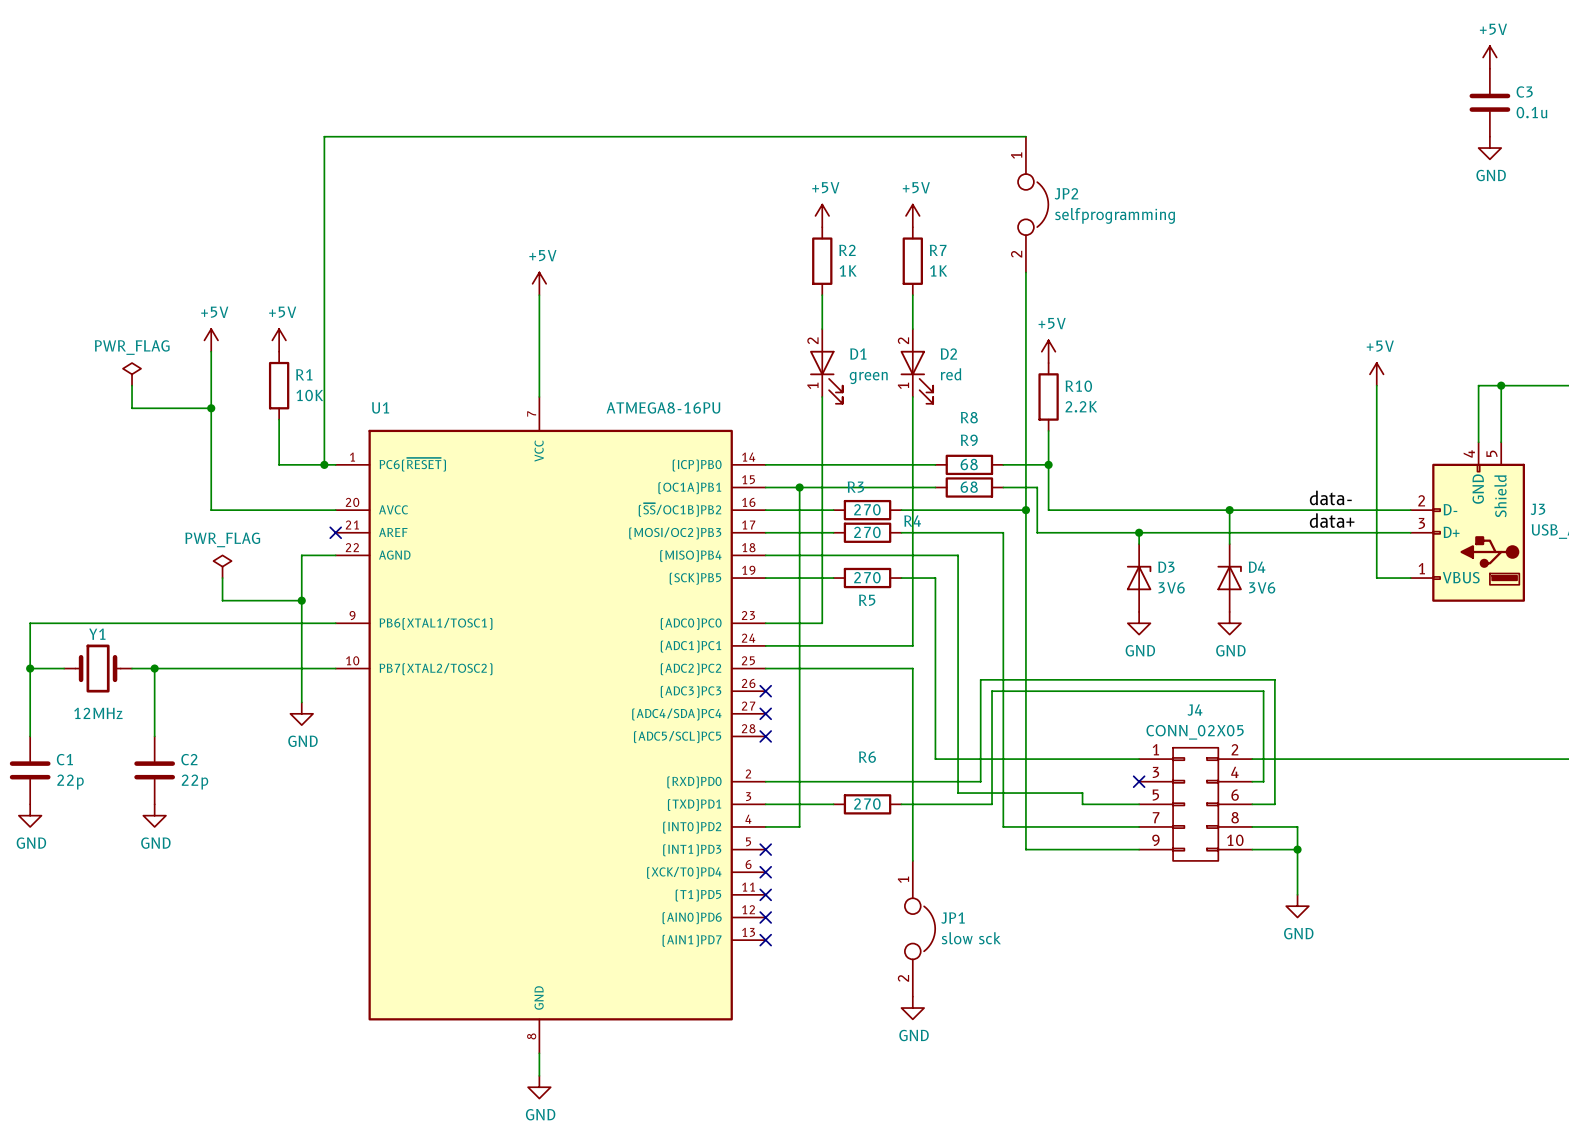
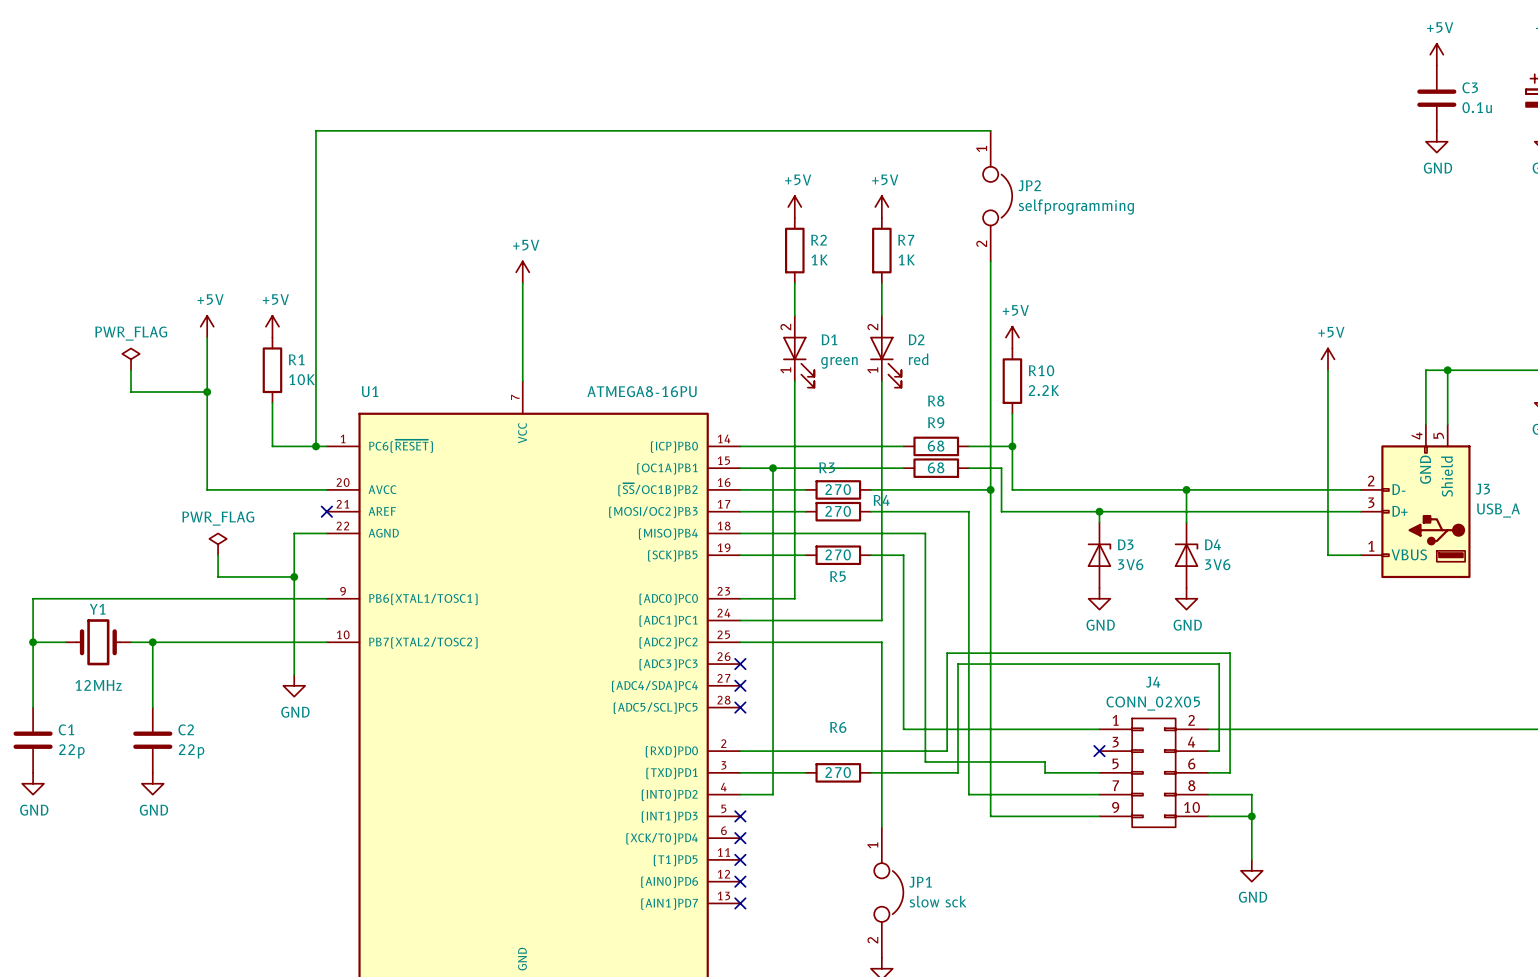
label: data- (1330, 497) -> none
label: data+ (1332, 520) -> none

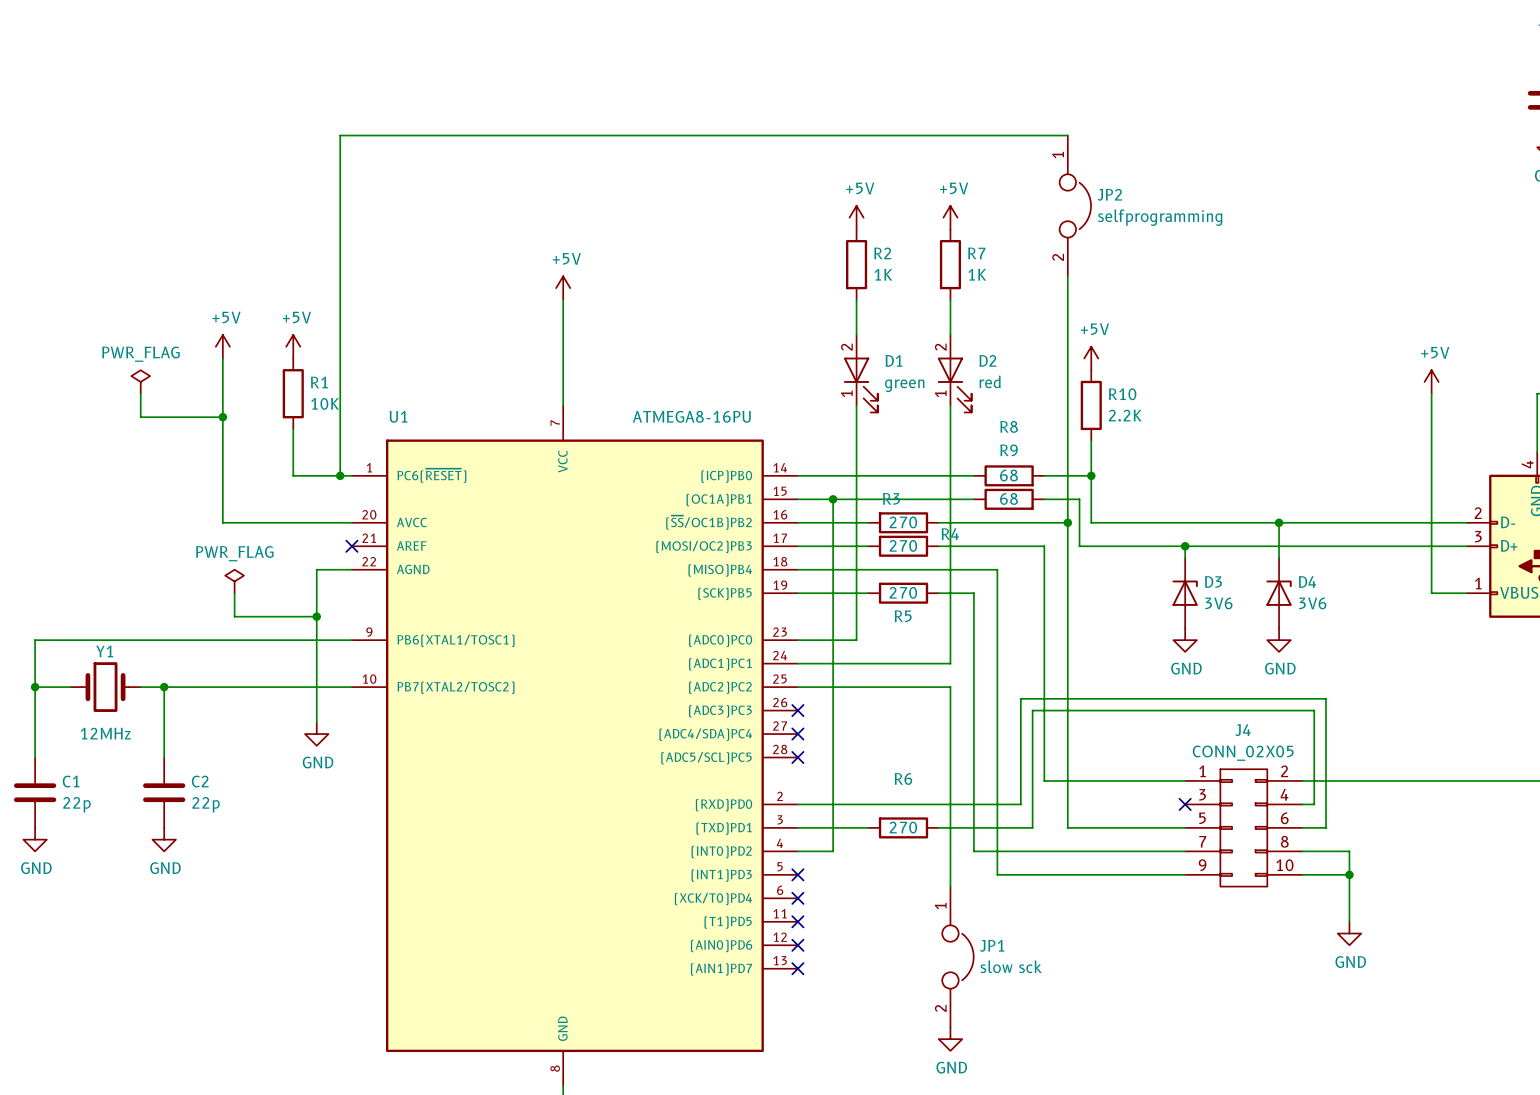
wire: (903, 729) (968, 729) (968, 794) -> (973, 780) (973, 851) (1044, 851)
wire: (925, 761) (1045, 761) (1045, 772) -> (1067, 827) (1126, 827)
wire: (990, 772) (990, 816) -> (997, 816) (997, 874) (1067, 874)

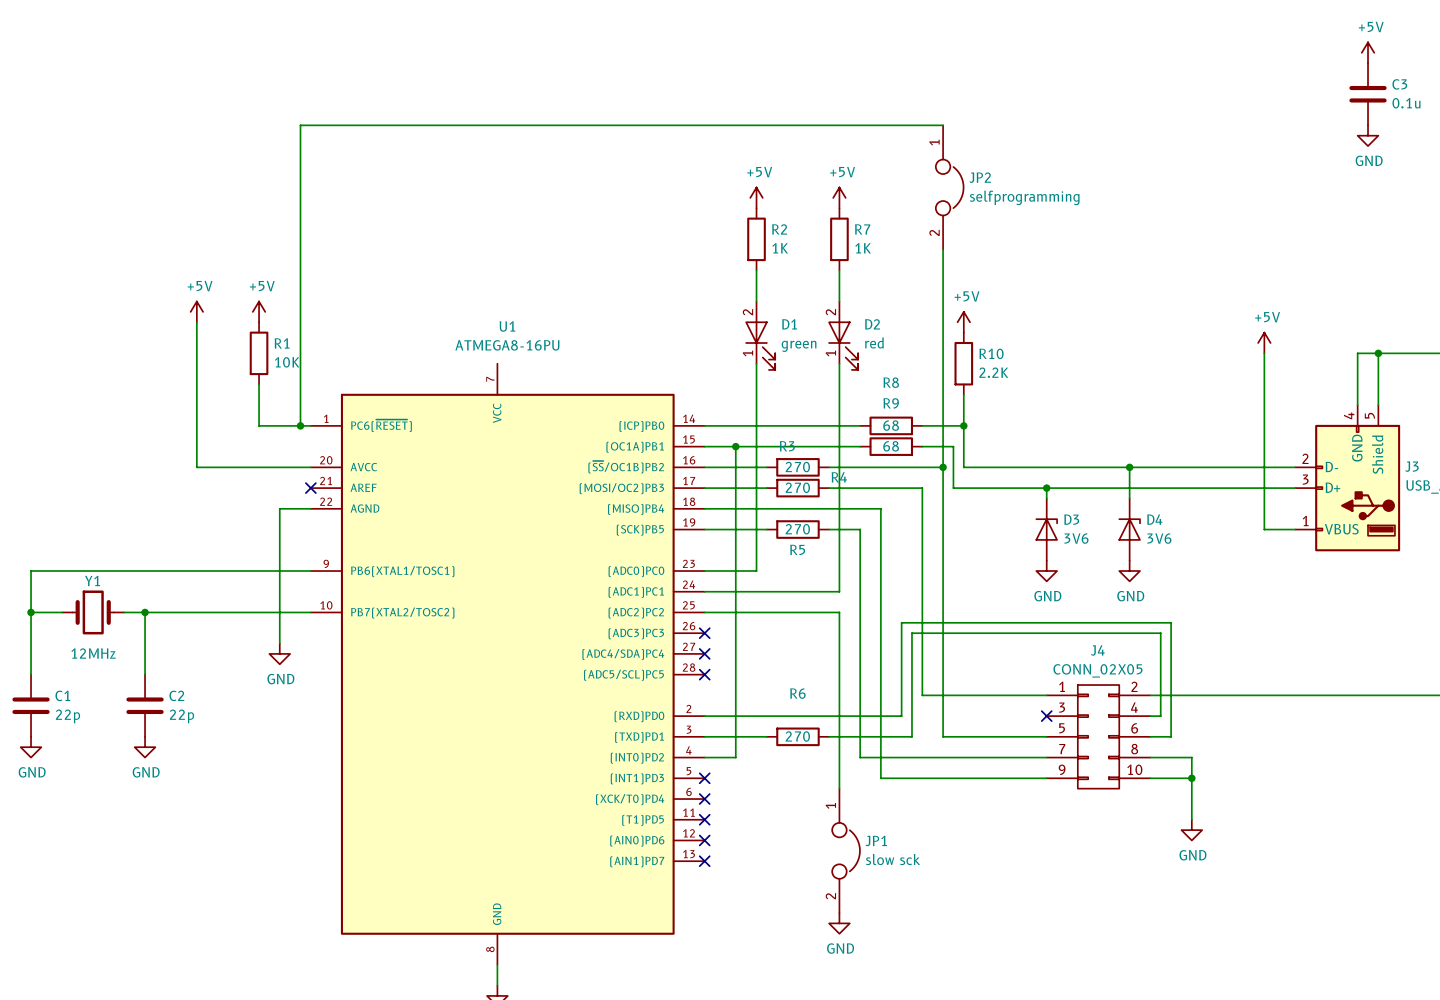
power symbol: +5V (563, 288) -> none
wire: (563, 299) (563, 405) -> none
power symbol: PWR_FLAG (140, 381) -> none
wire: (140, 393) (140, 417) (222, 417) -> none
U1 name position: U1 (398, 416) -> U1 (507, 326)
U1 value position: ATMEGA8-16PU (691, 416) -> ATMEGA8-16PU (507, 345)
junction: (222, 417) -> none
power symbol: PWR_FLAG (234, 581) -> none
wire: (234, 593) (234, 616) (316, 616) -> none
junction: (316, 616) -> none

